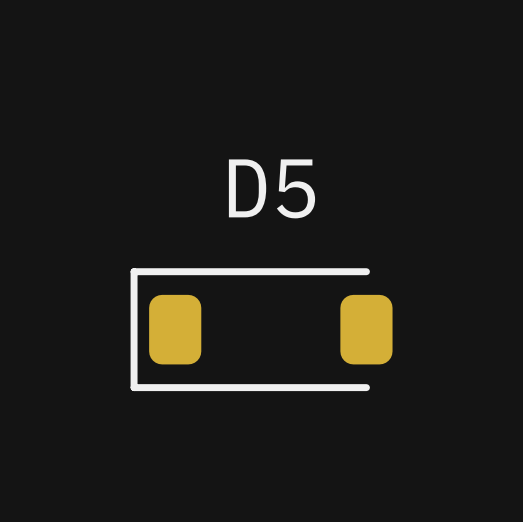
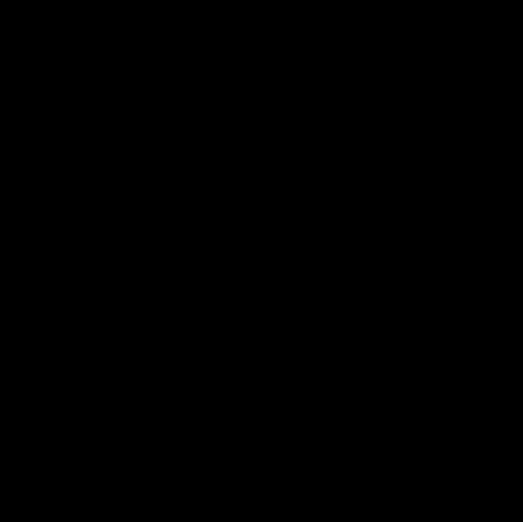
D5: (261, 329) -> none

